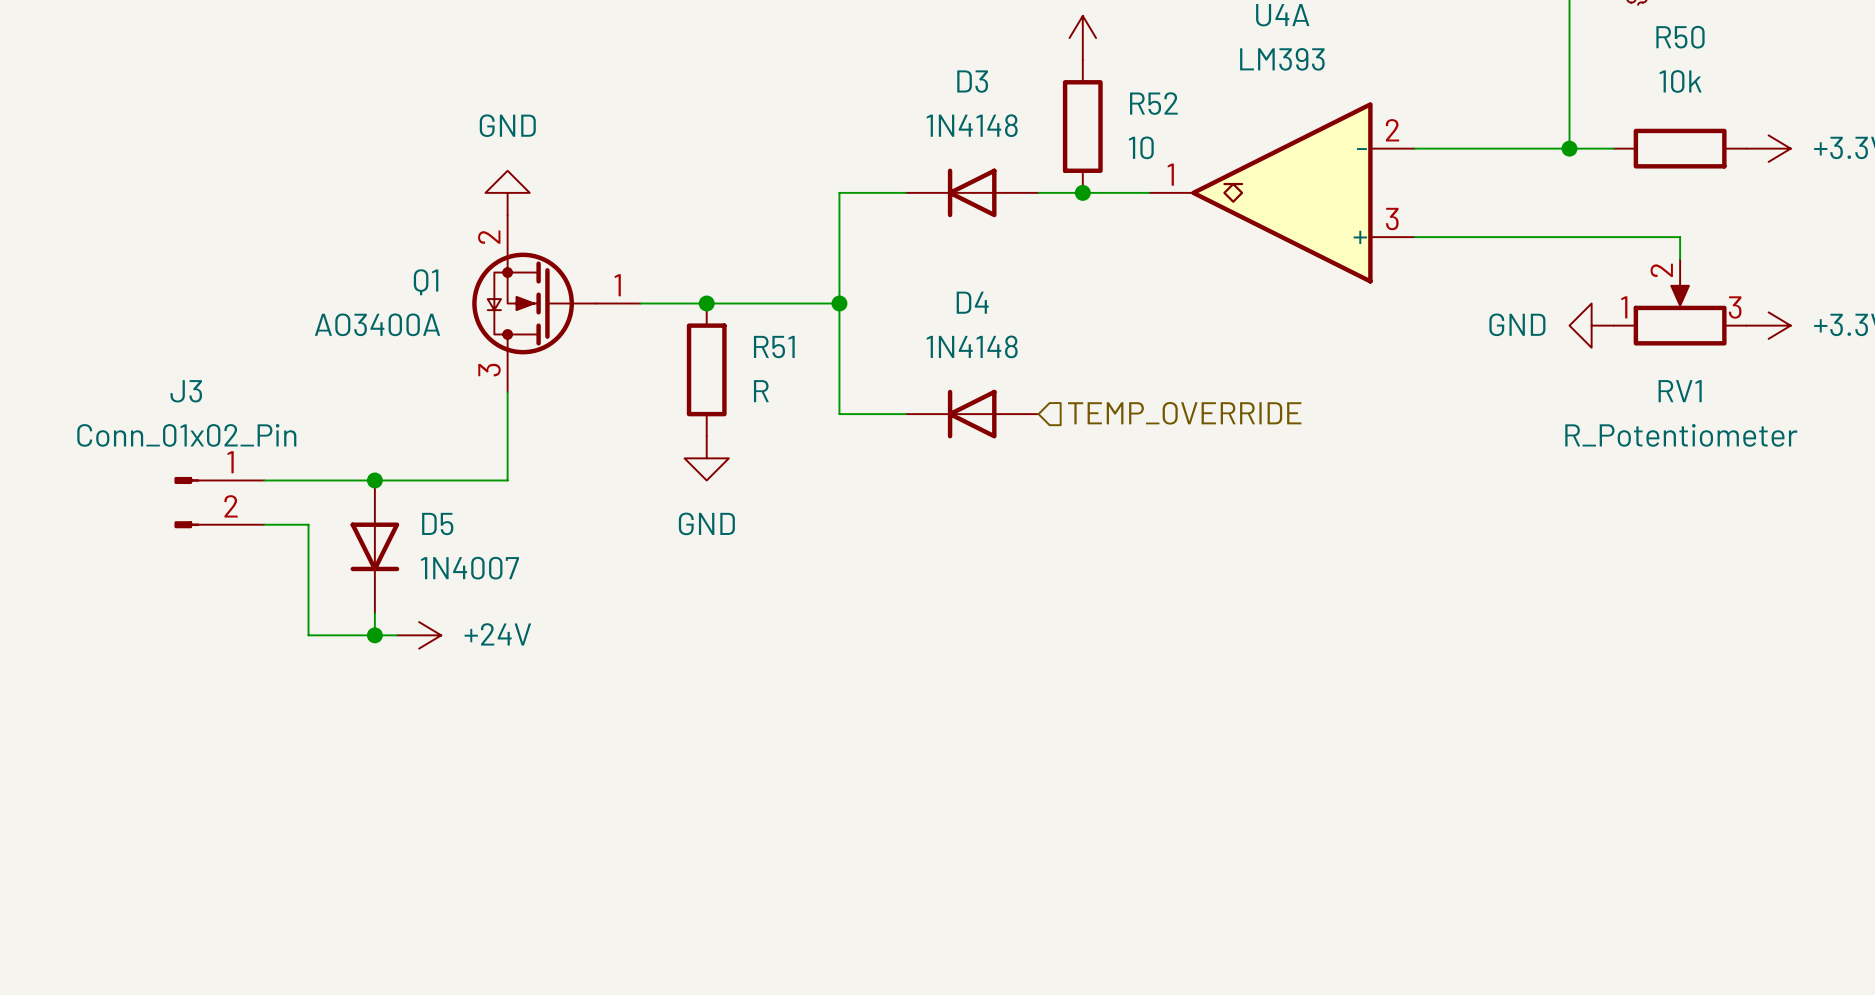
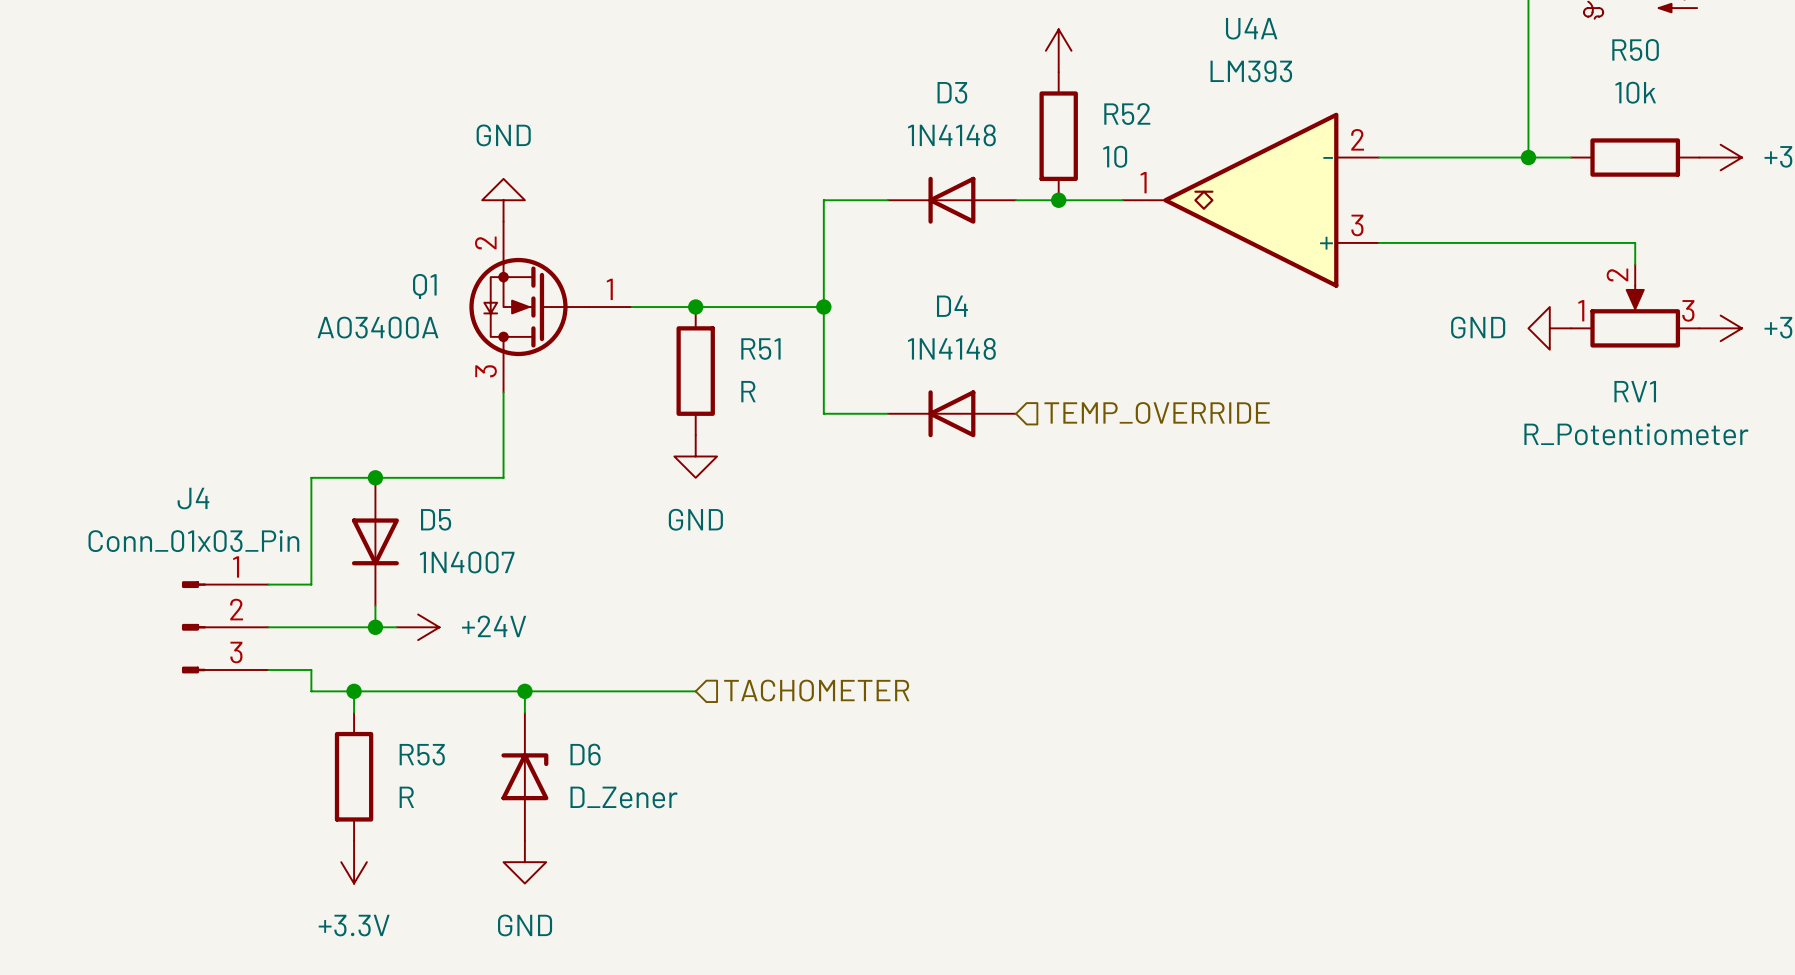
wire: (264, 480) (308, 480) -> (311, 520) (311, 477)
J3: Conn_01x02_Pin (219, 502) -> none
wire: (264, 524) (308, 524) -> (268, 627) (311, 627)
wire: (308, 591) (308, 635) -> (311, 584) (268, 584)
J4: none -> Conn_01x03_Pin (225, 627)
wire: none -> (268, 670) (311, 670) (311, 691) (695, 691)
hierarchical label: none -> TACHOMETER (816, 690)
wire: none -> (354, 691) (354, 712)
junction: none -> (354, 691)
wire: none -> (524, 691) (524, 712)
junction: none -> (524, 691)
R53: none -> R (354, 776)
D6: none -> D_Zener (524, 776)
power symbol: none -> +3.3V (354, 862)
power symbol: none -> GND (524, 862)

